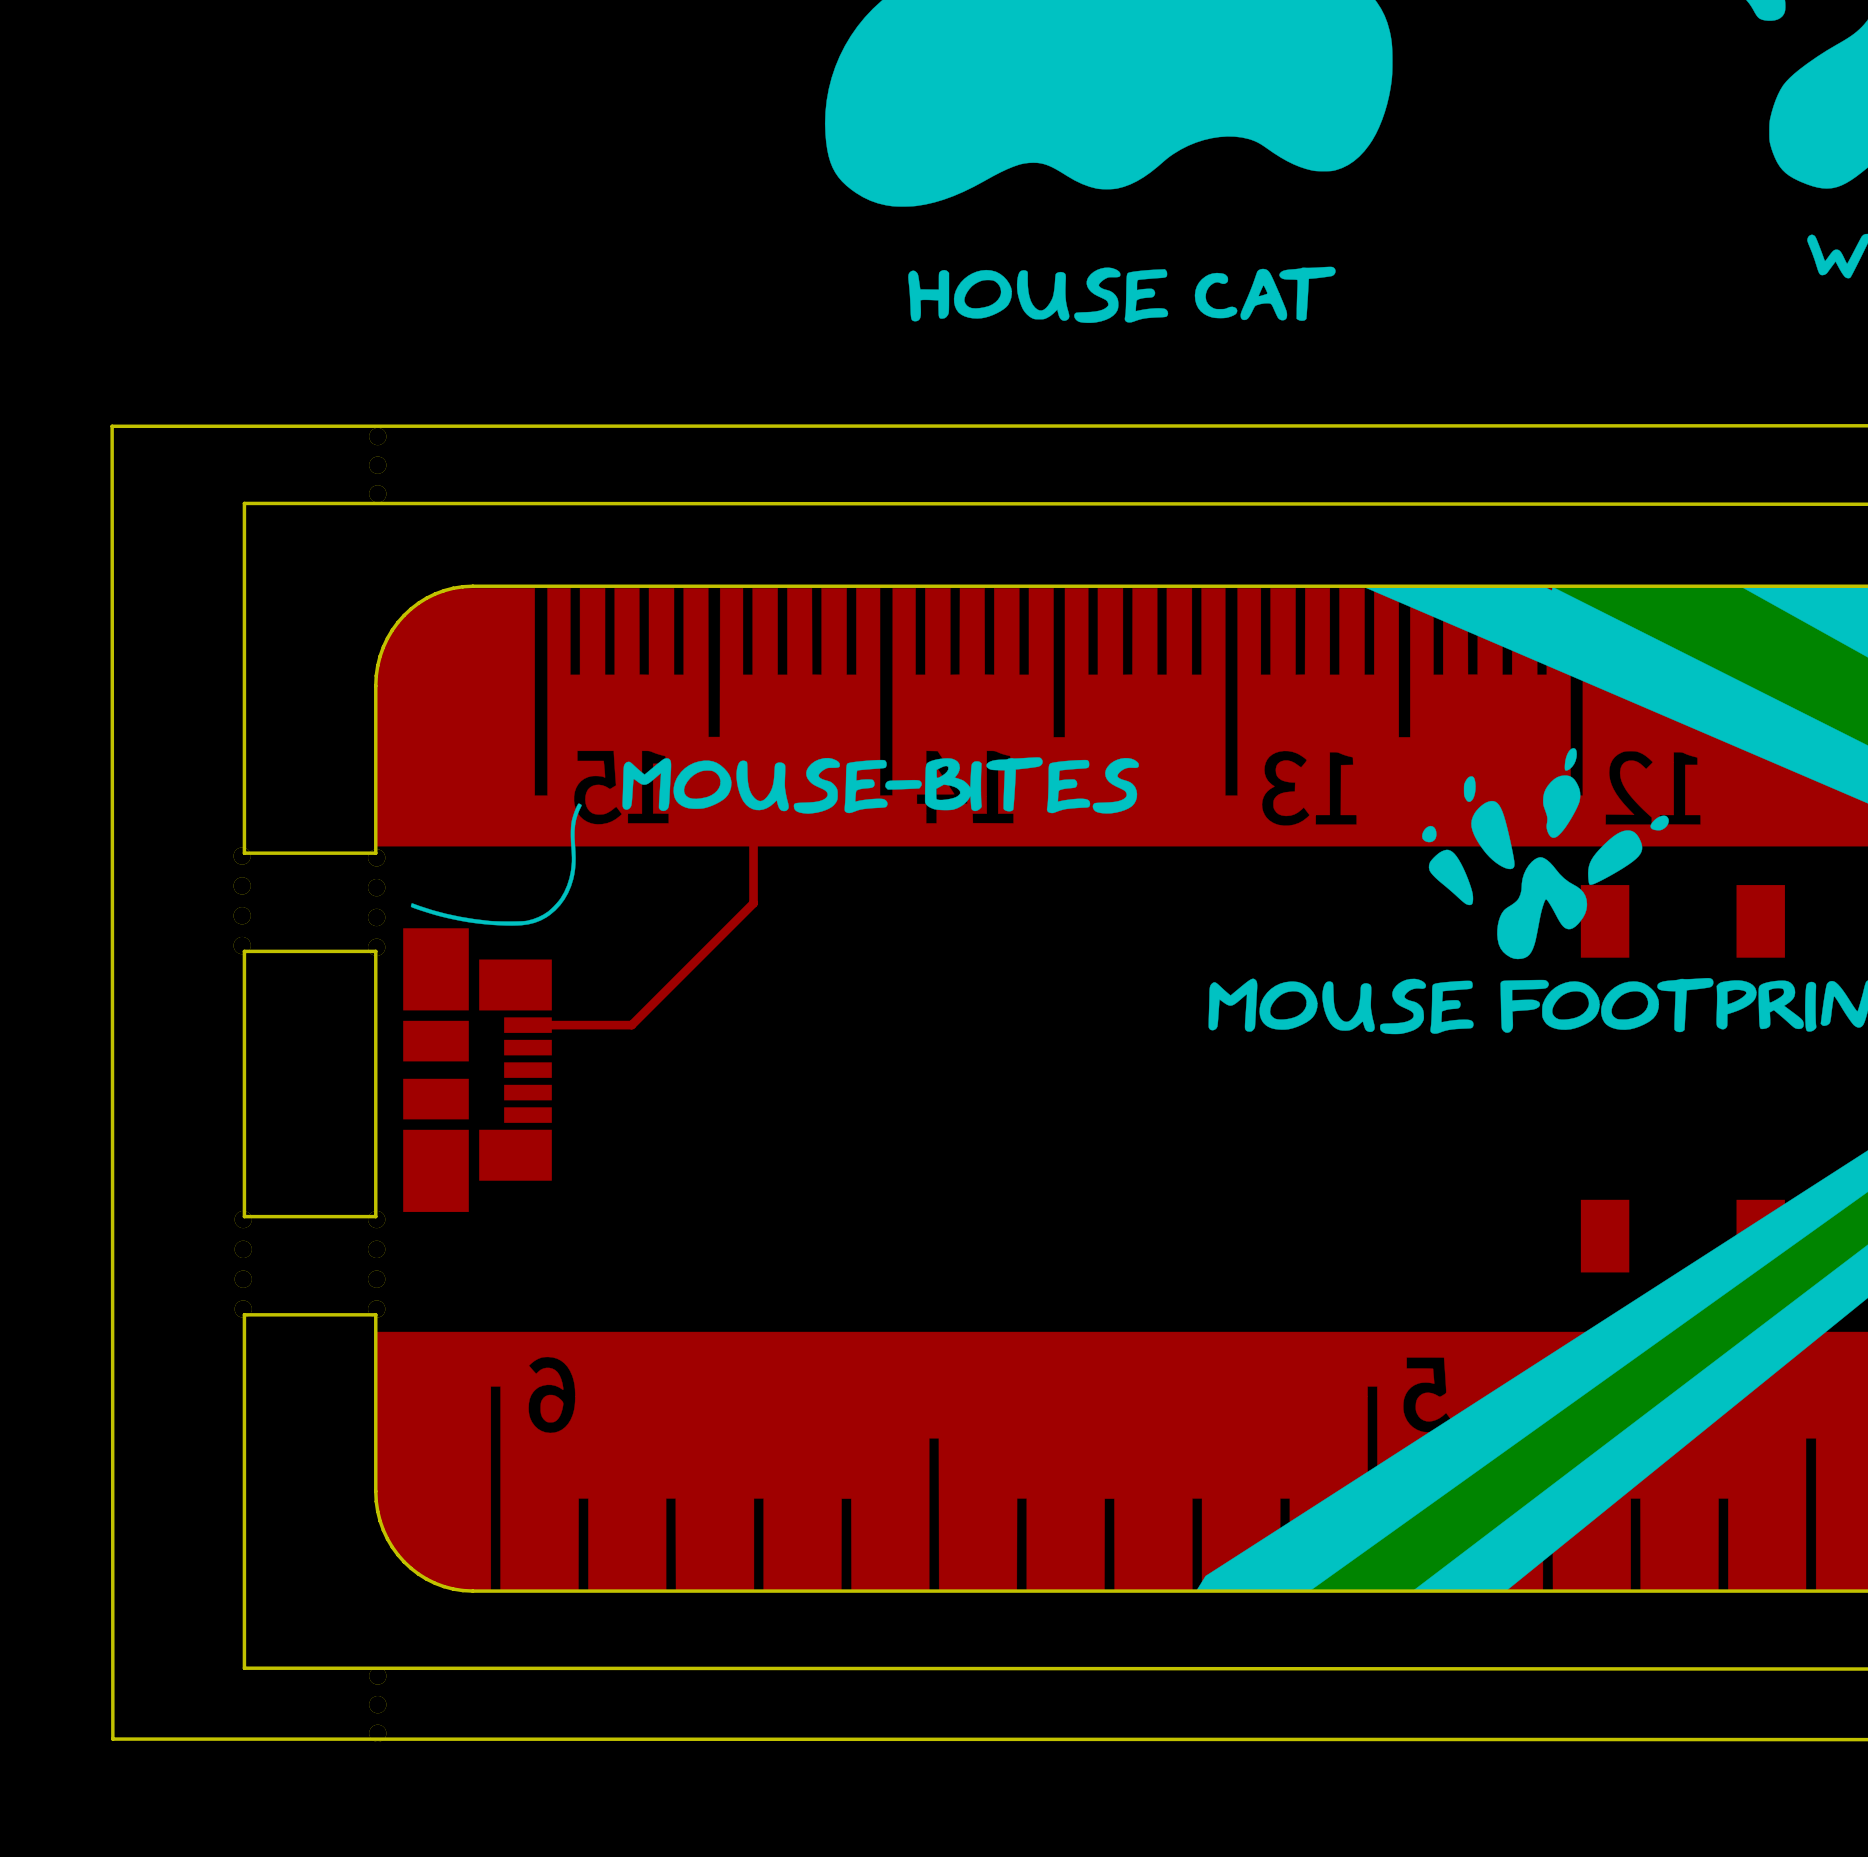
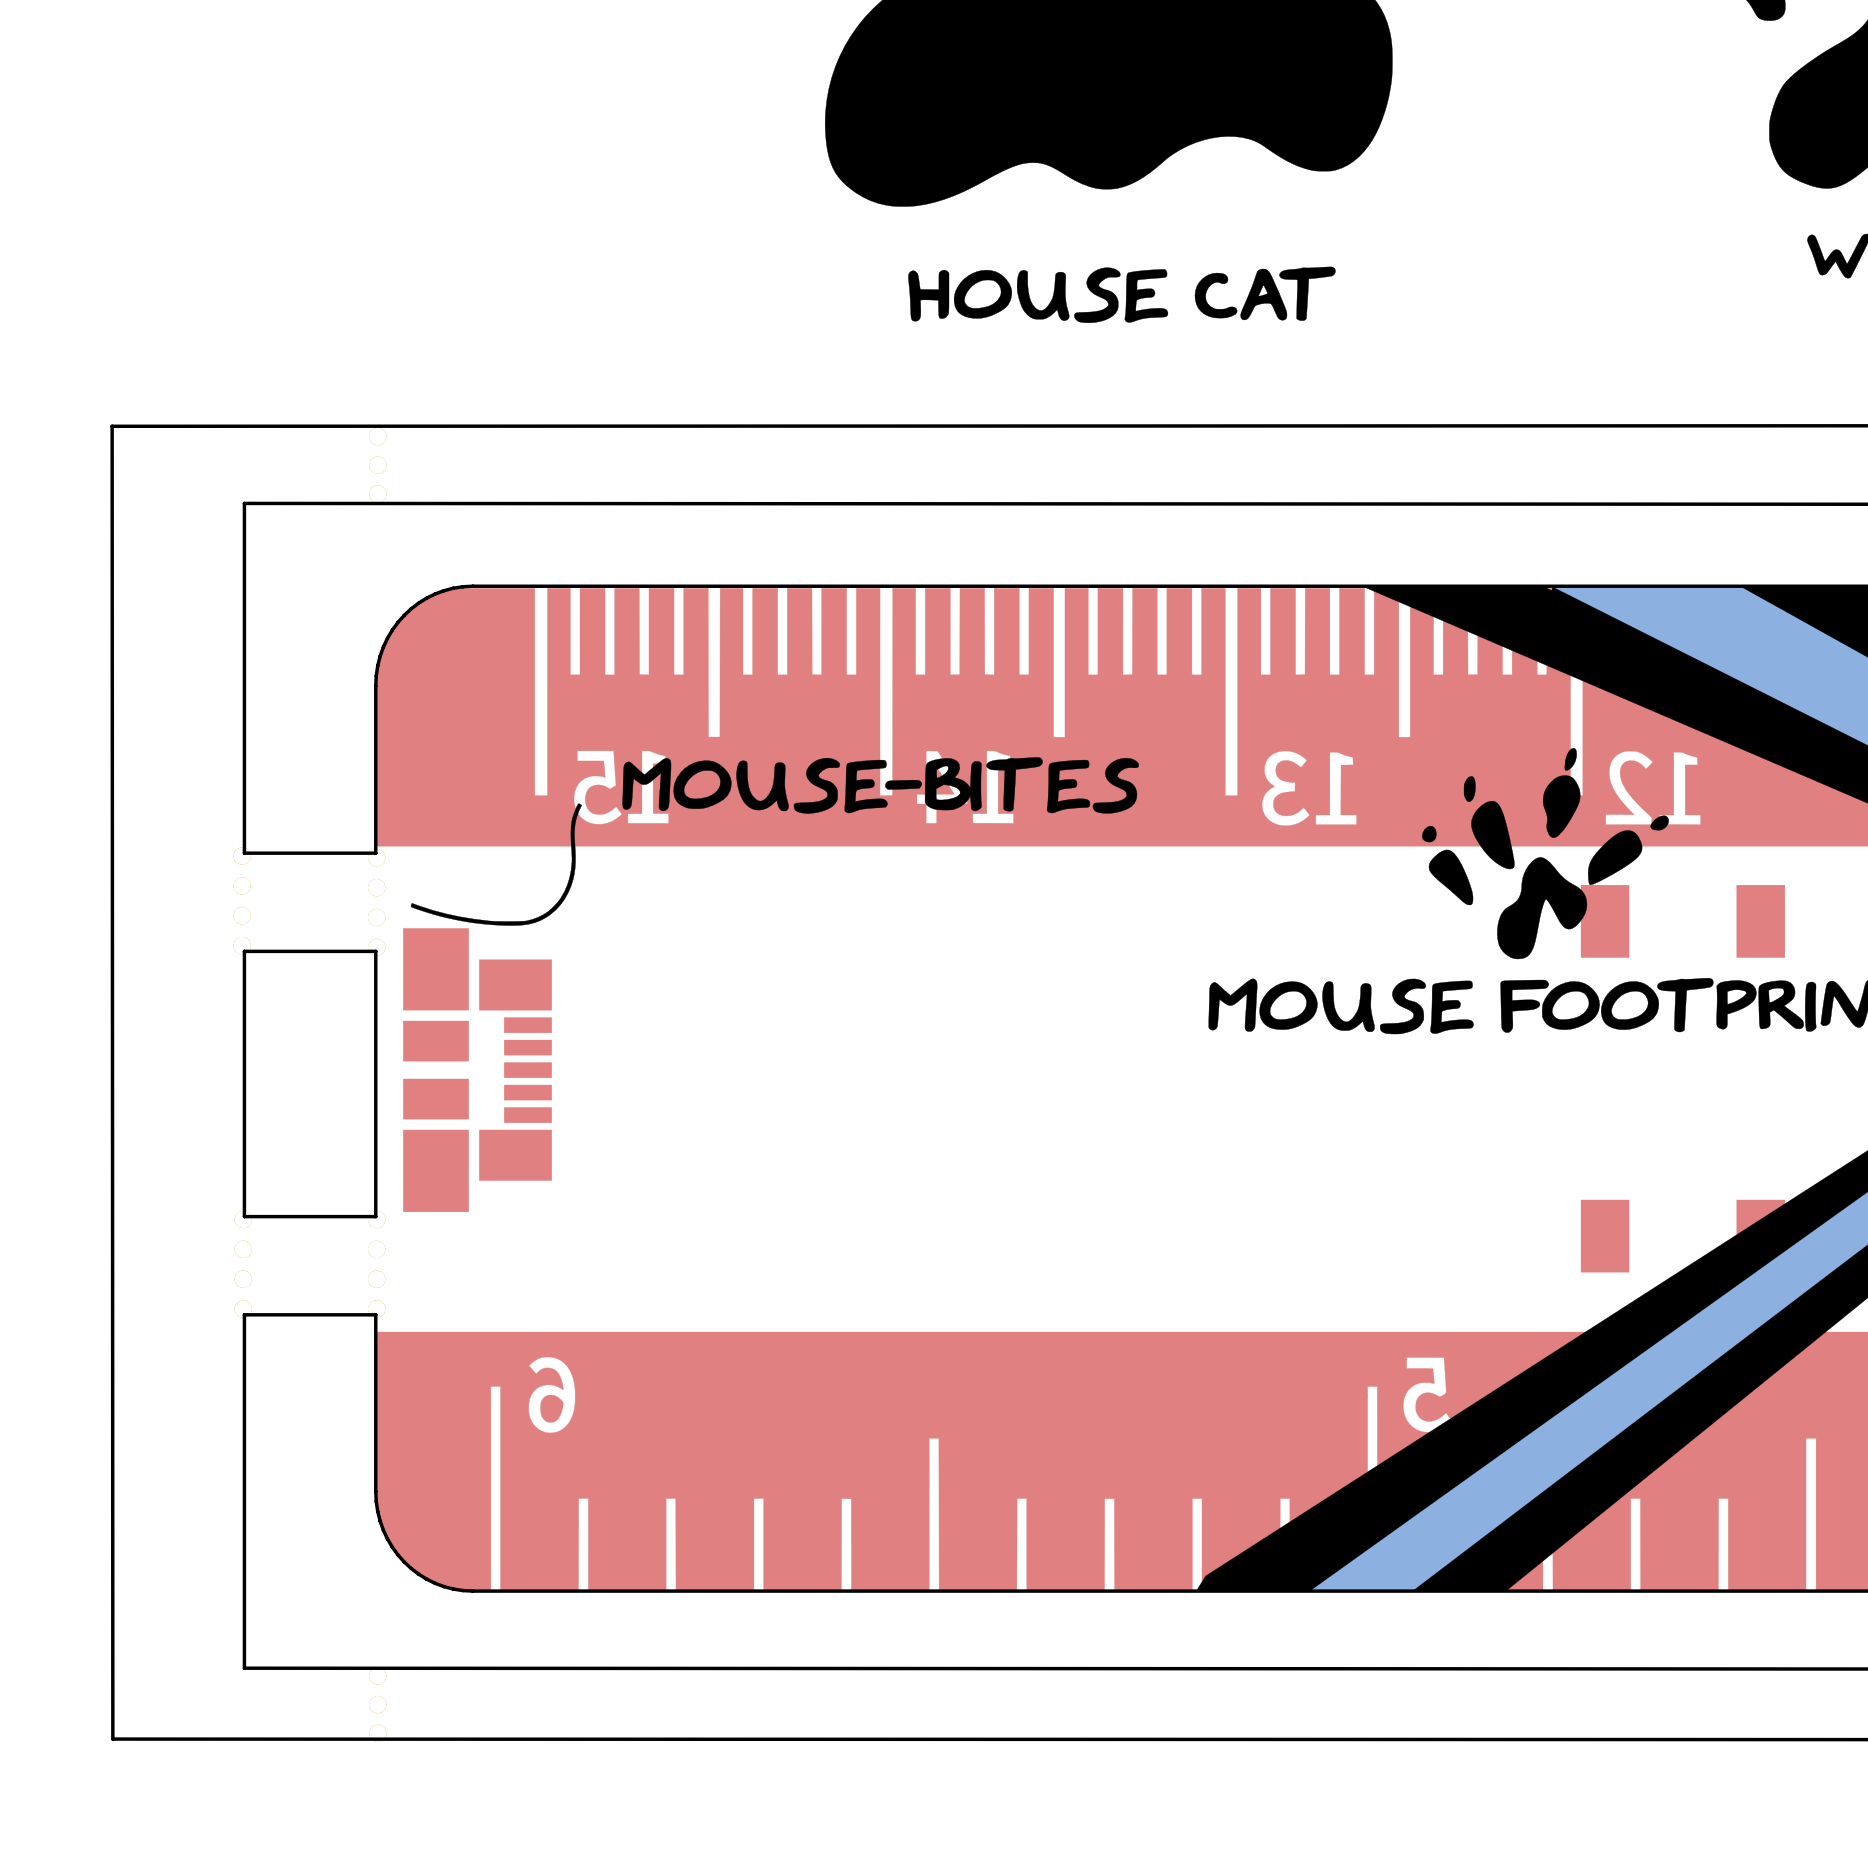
top track: (753, 832) (753, 903) (631, 1025) (527, 1025) -> none

